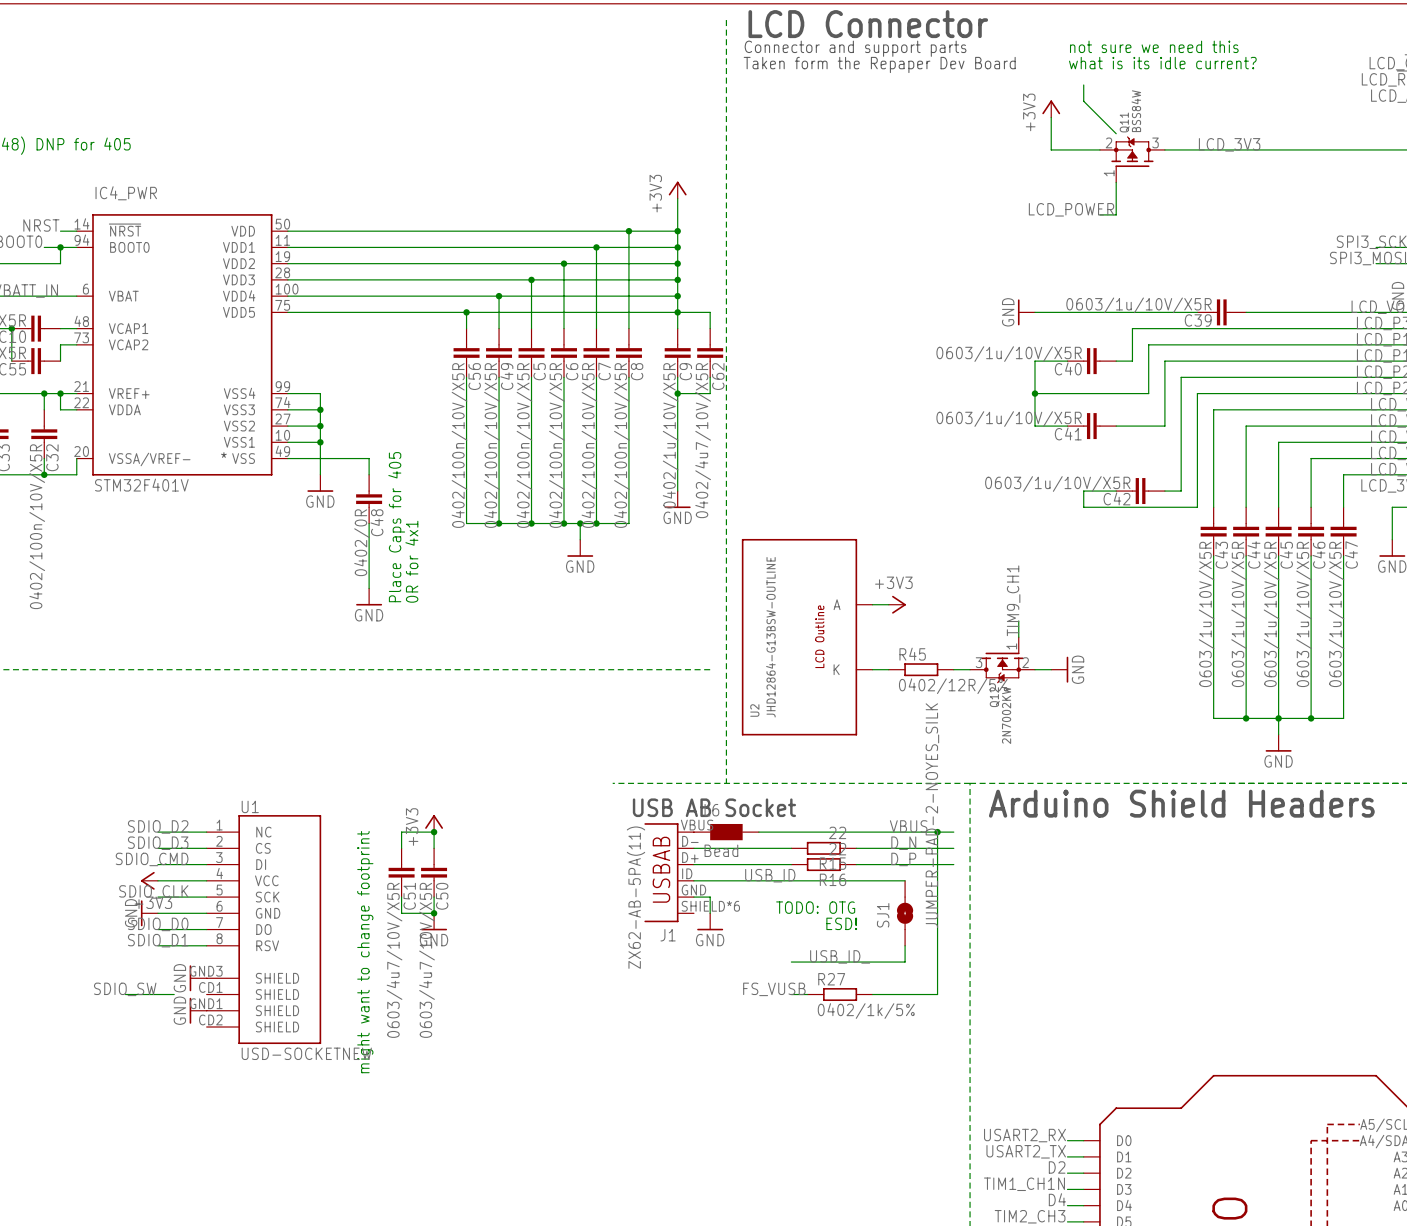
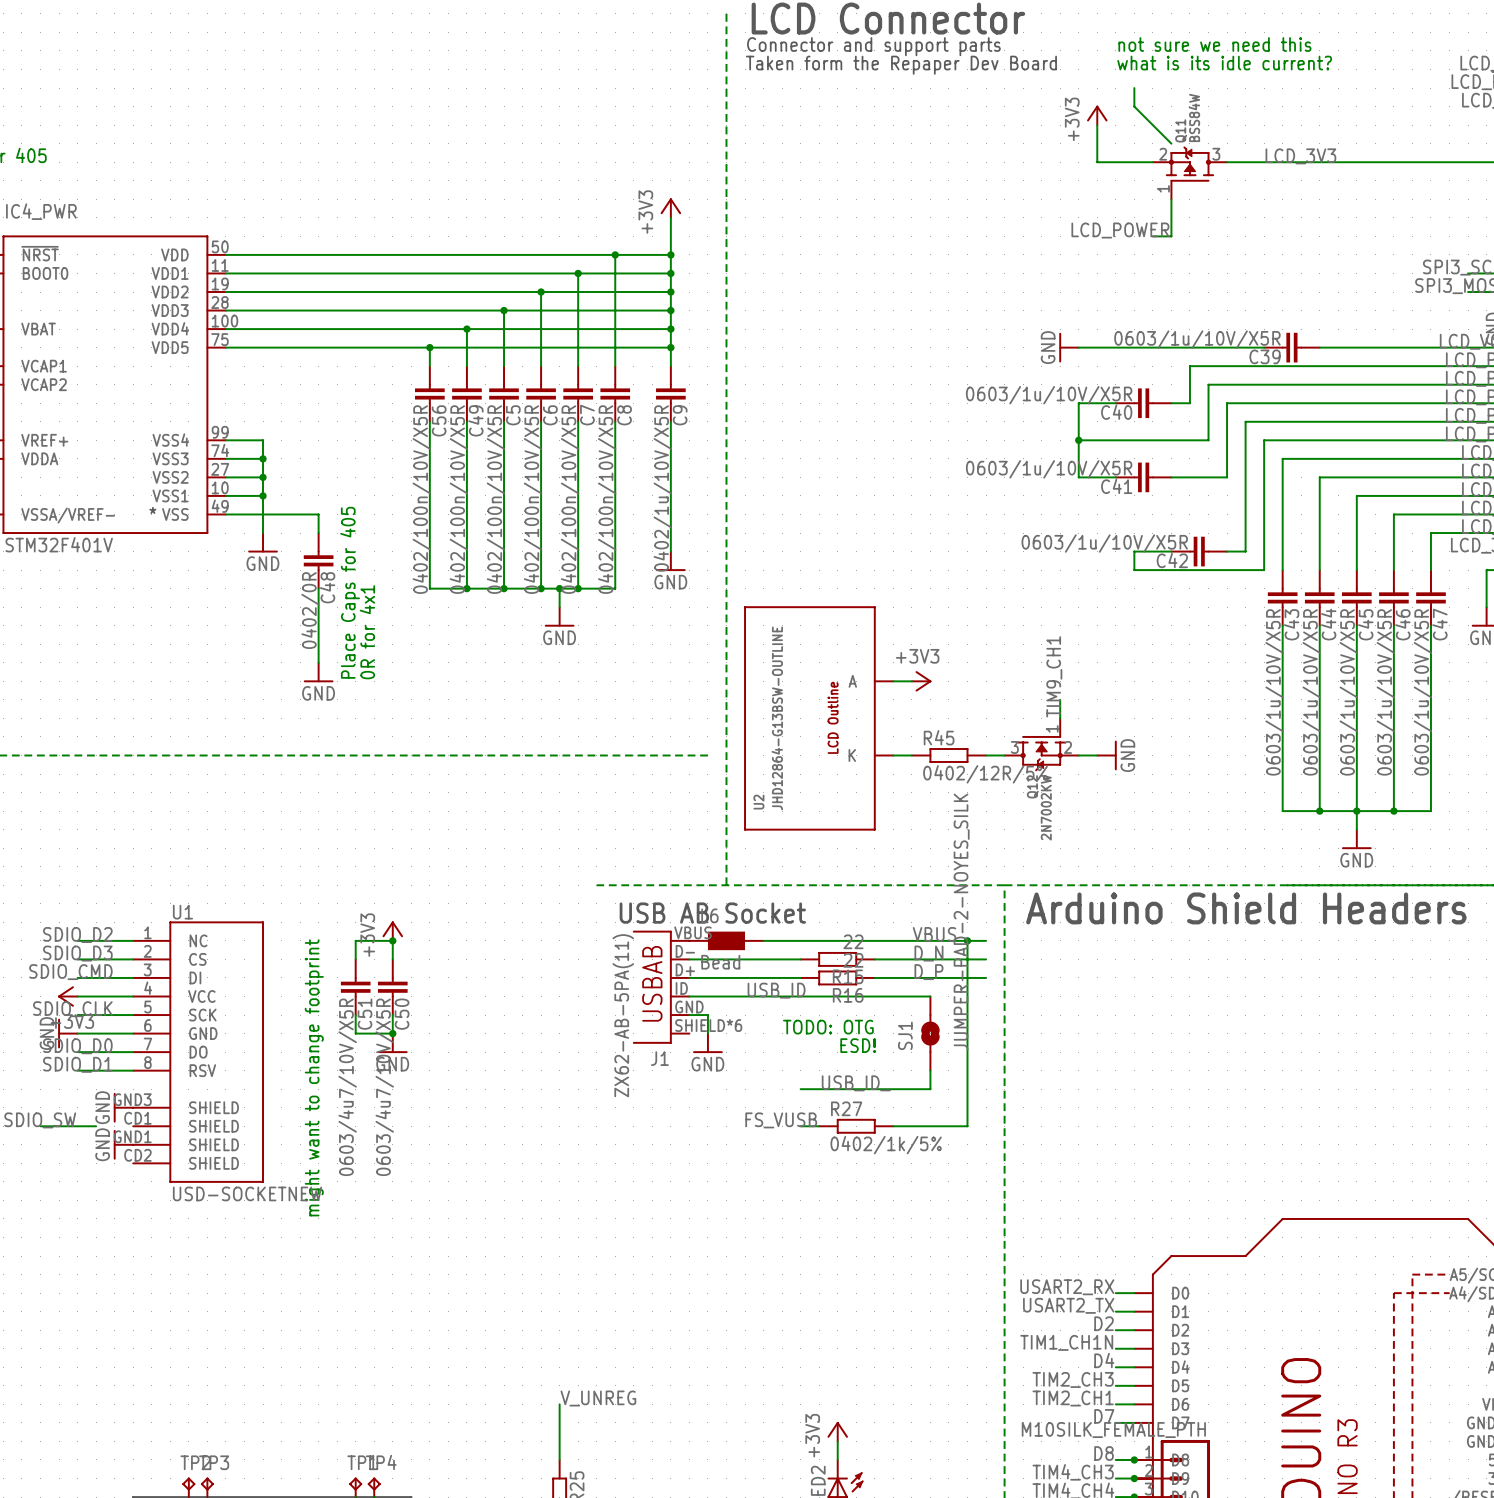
wire: (677, 312) (710, 312) (710, 328) -> none
C62: 0402/4u7/10V/X5R (710, 352) -> none
wire: (710, 377) (710, 393) (677, 393) -> none
junction: (677, 393) -> none

